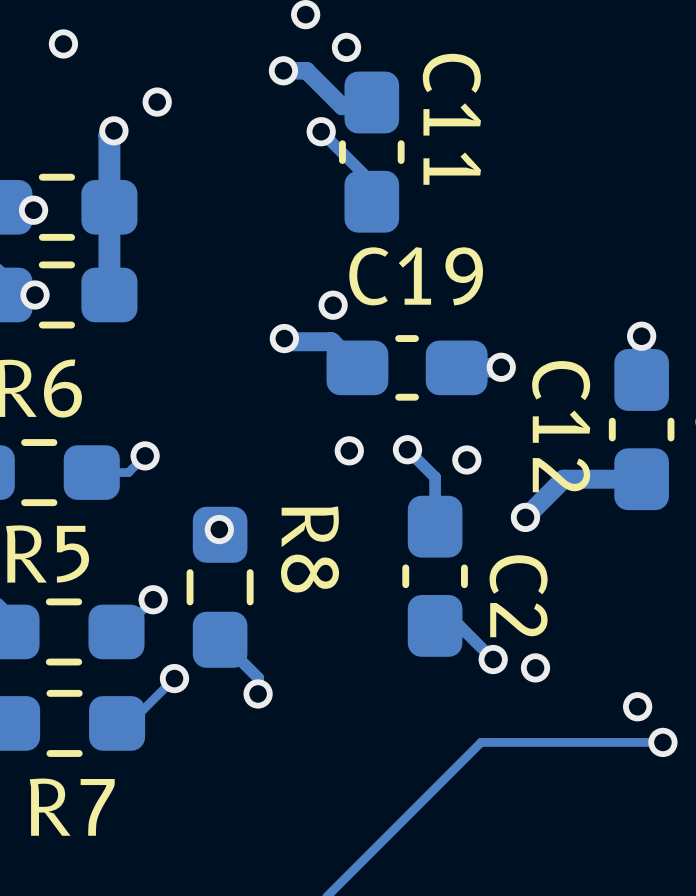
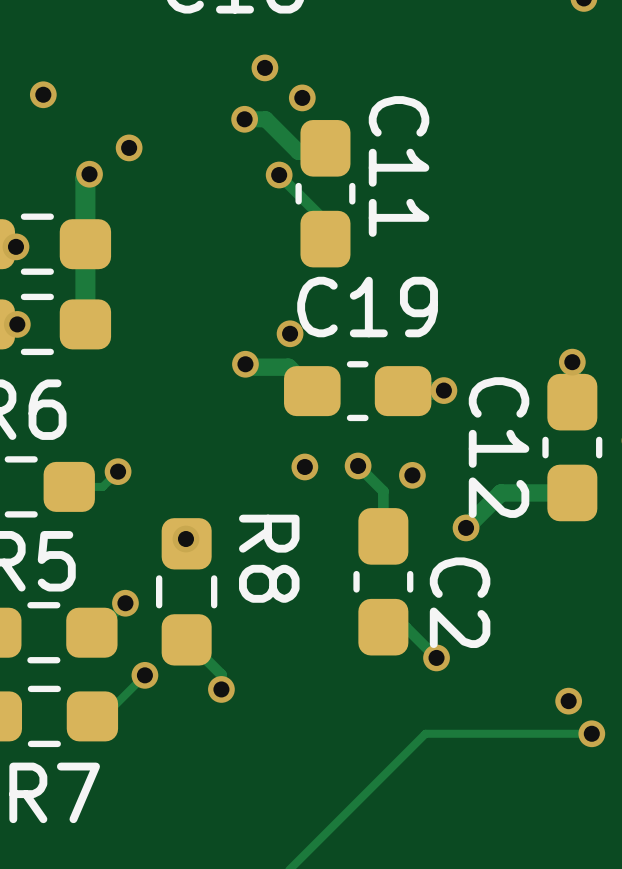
via: (535, 667) -> none

